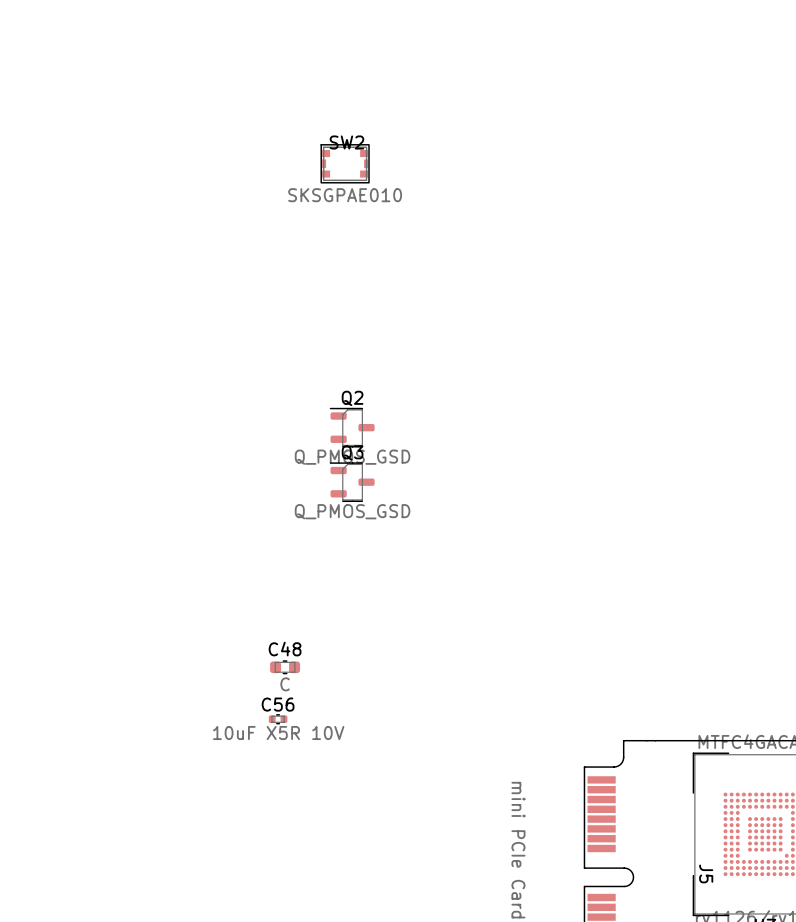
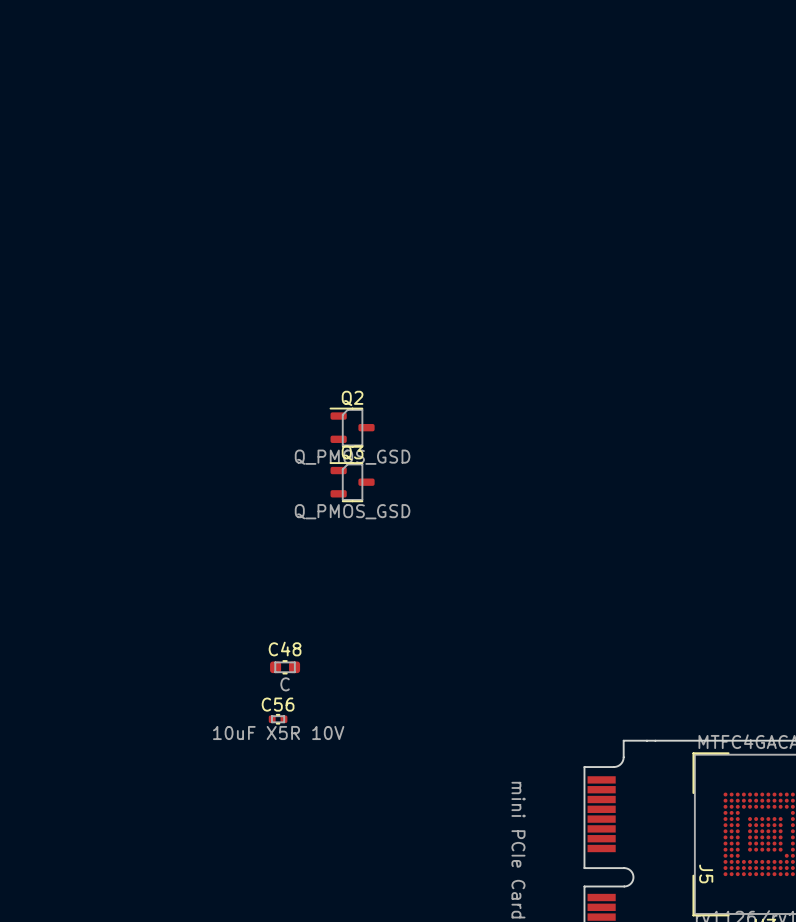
SW2: SKSGPAE010 (345, 163) -> none

